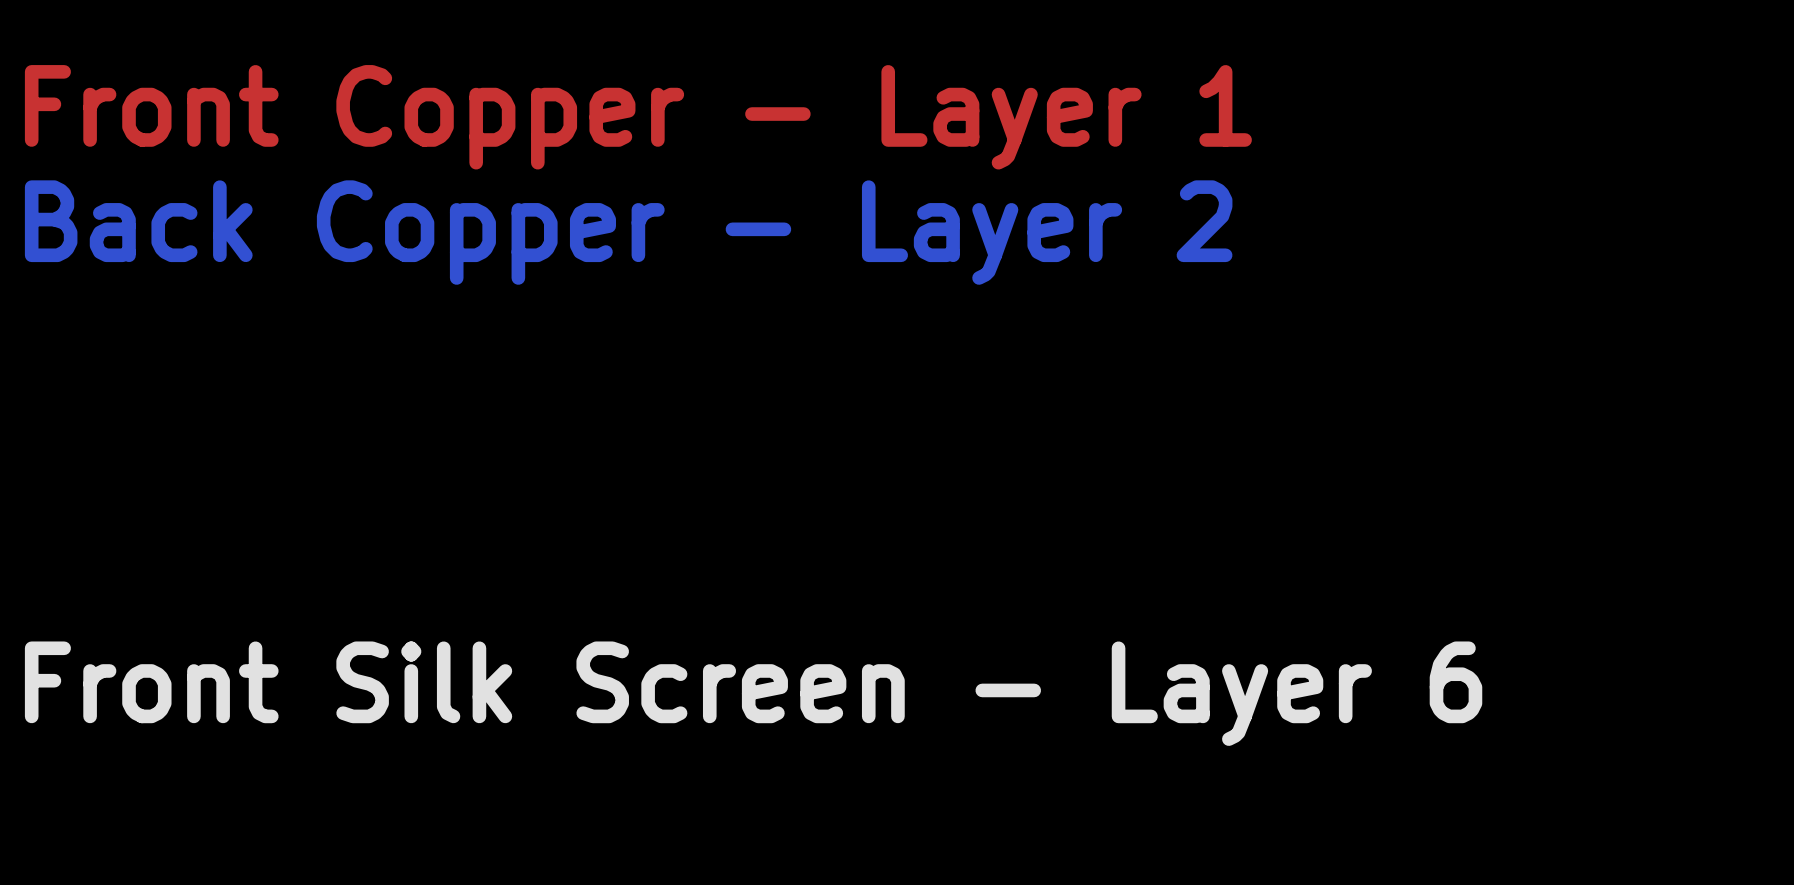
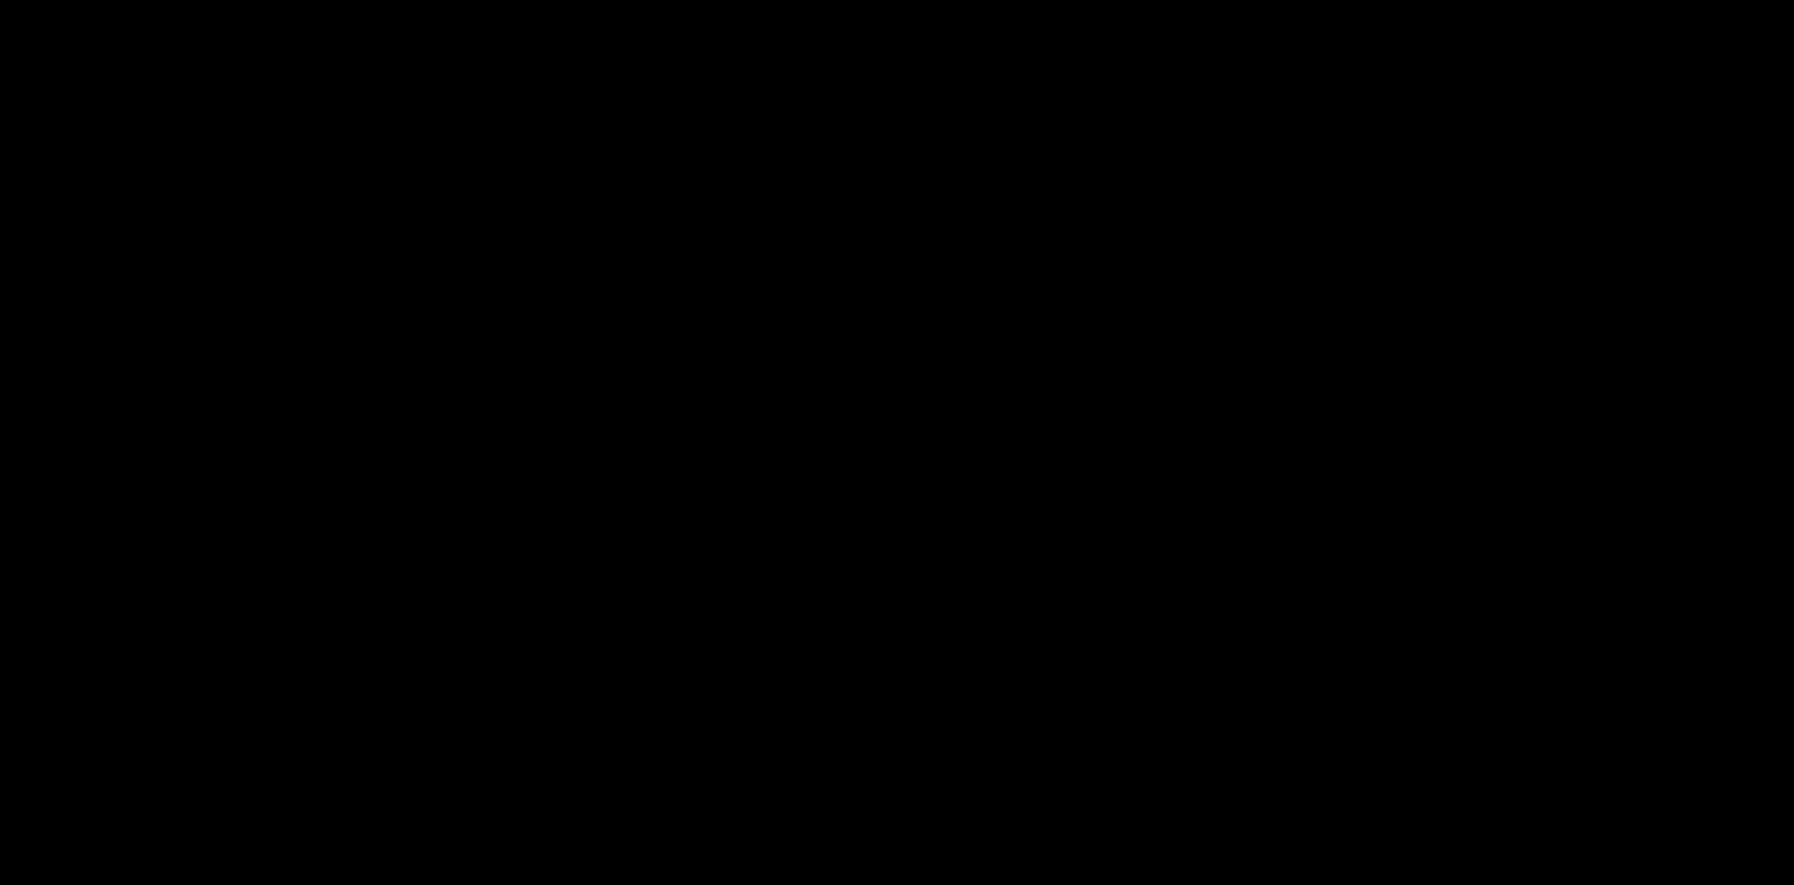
text: Front Copper - Layer 1 (638, 117) -> none
text: Back Copper - Layer 2 (628, 232) -> none
text: Front Silk Screen - Layer 6 (753, 693) -> none

